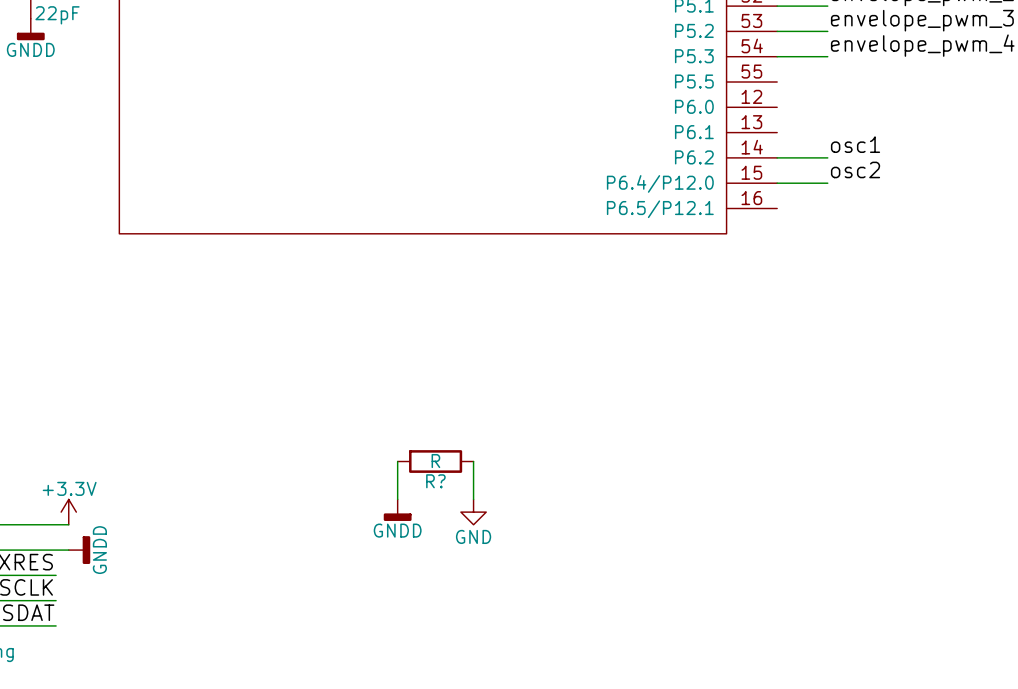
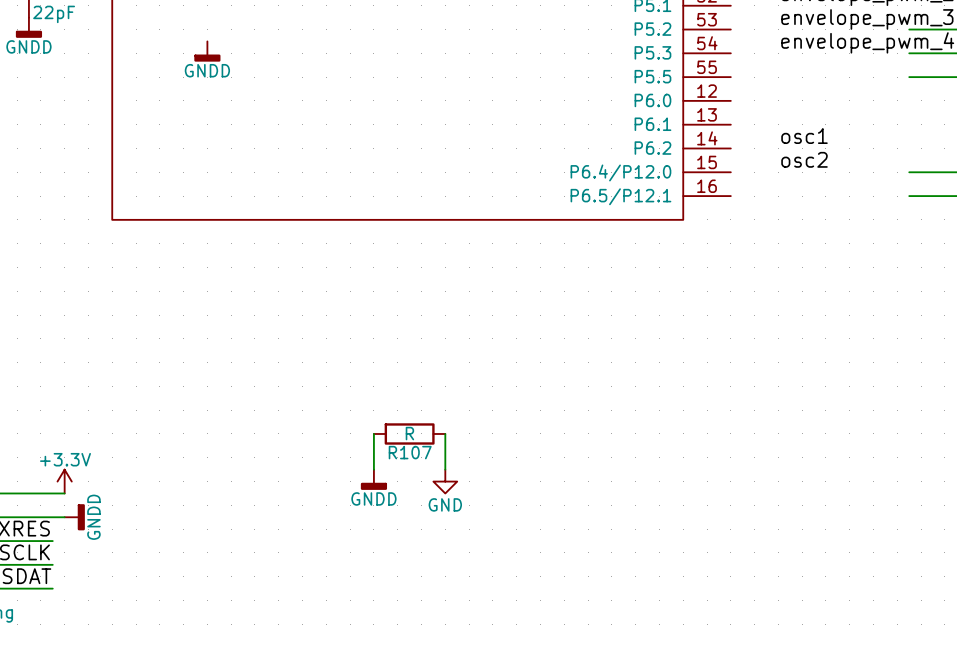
wire: (777, 6) (827, 6) -> (909, 29) (956, 29)
wire: (777, 31) (827, 31) -> (909, 53) (956, 53)
power symbol: none -> GNDD (207, 51)
wire: (777, 56) (827, 56) -> (909, 77) (956, 77)
wire: (777, 157) (827, 157) -> (909, 172) (956, 172)
wire: (777, 183) (827, 183) -> (909, 196) (956, 196)
R? name: R? (435, 481) -> R107 (410, 452)

